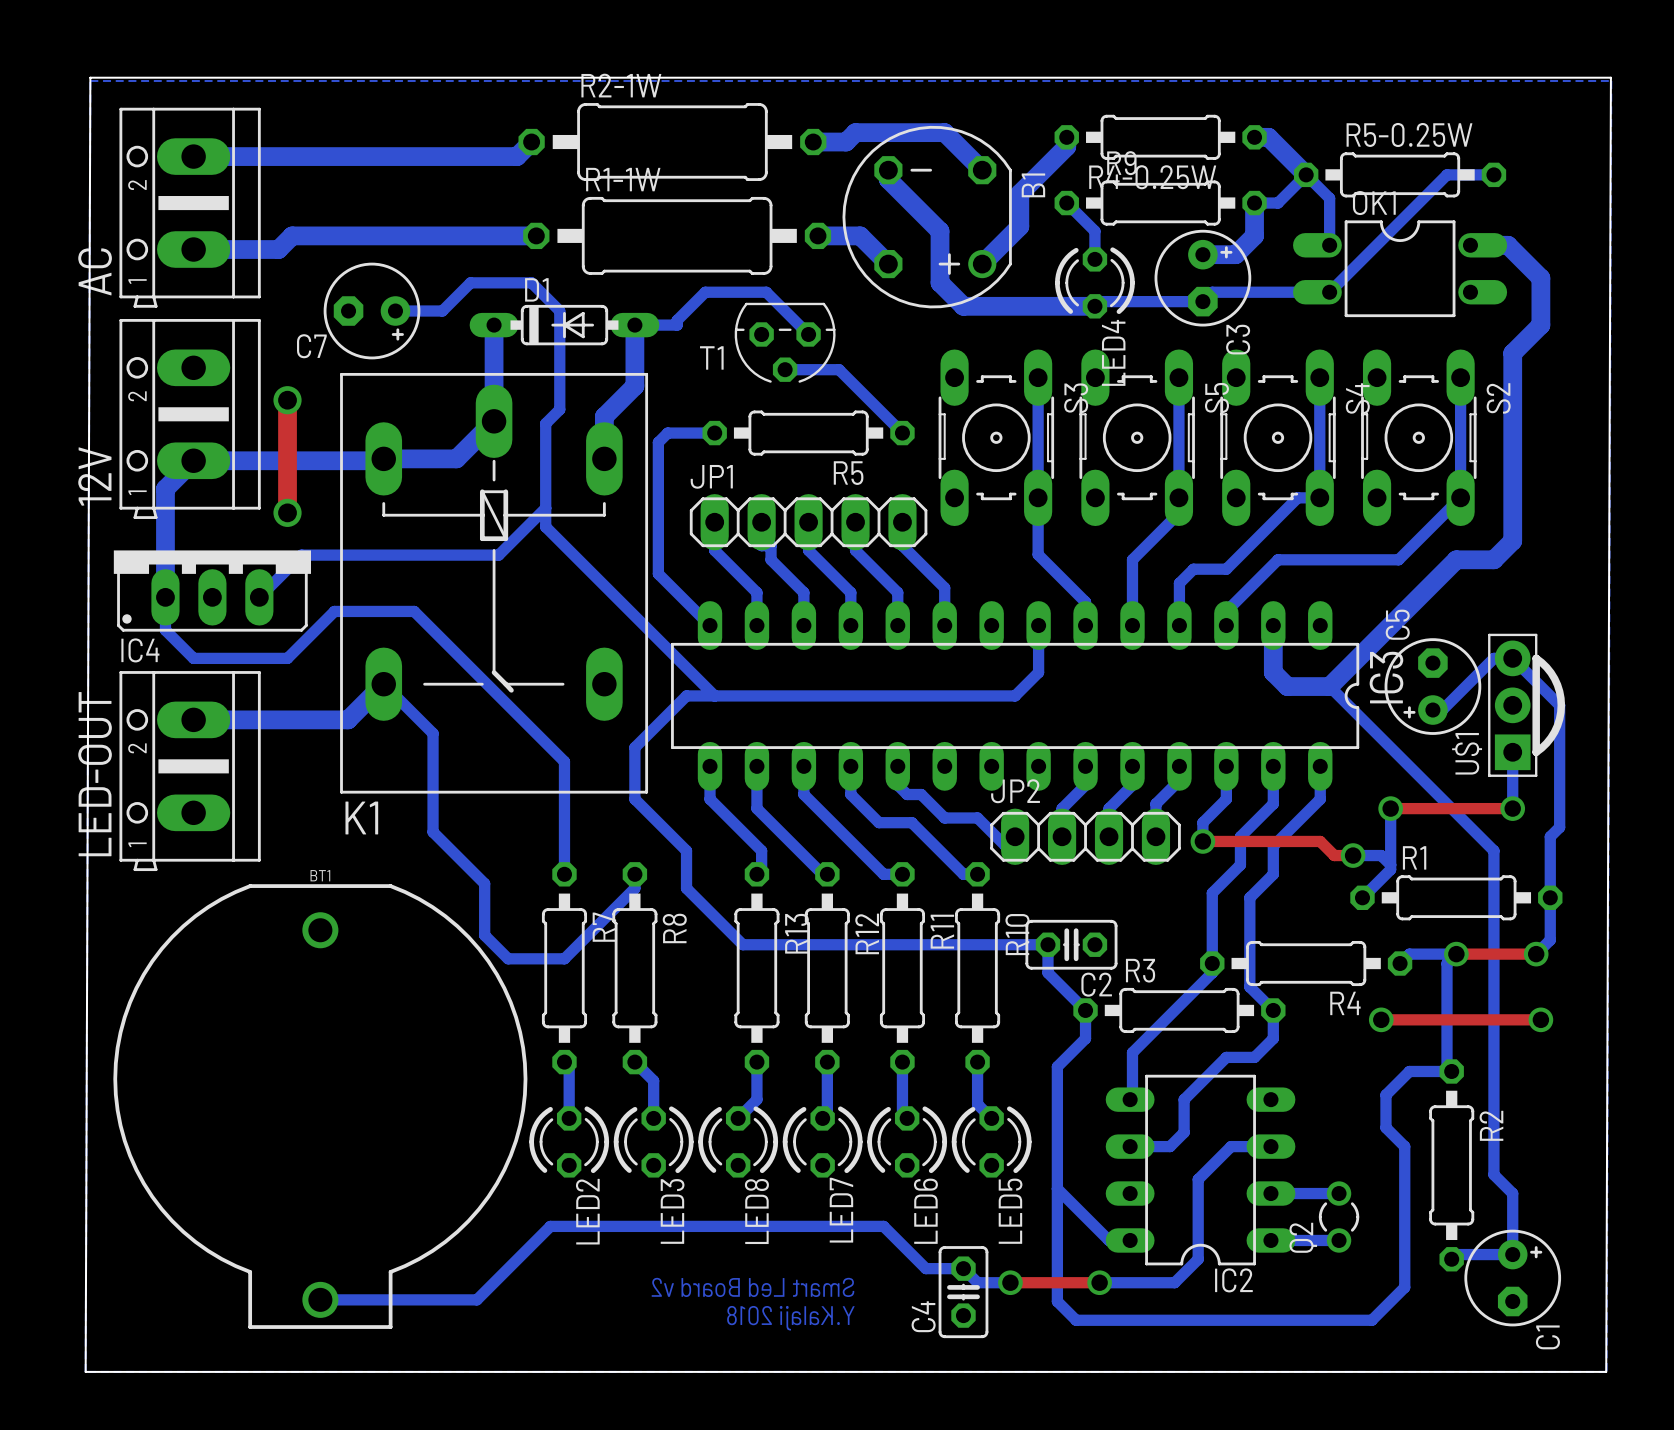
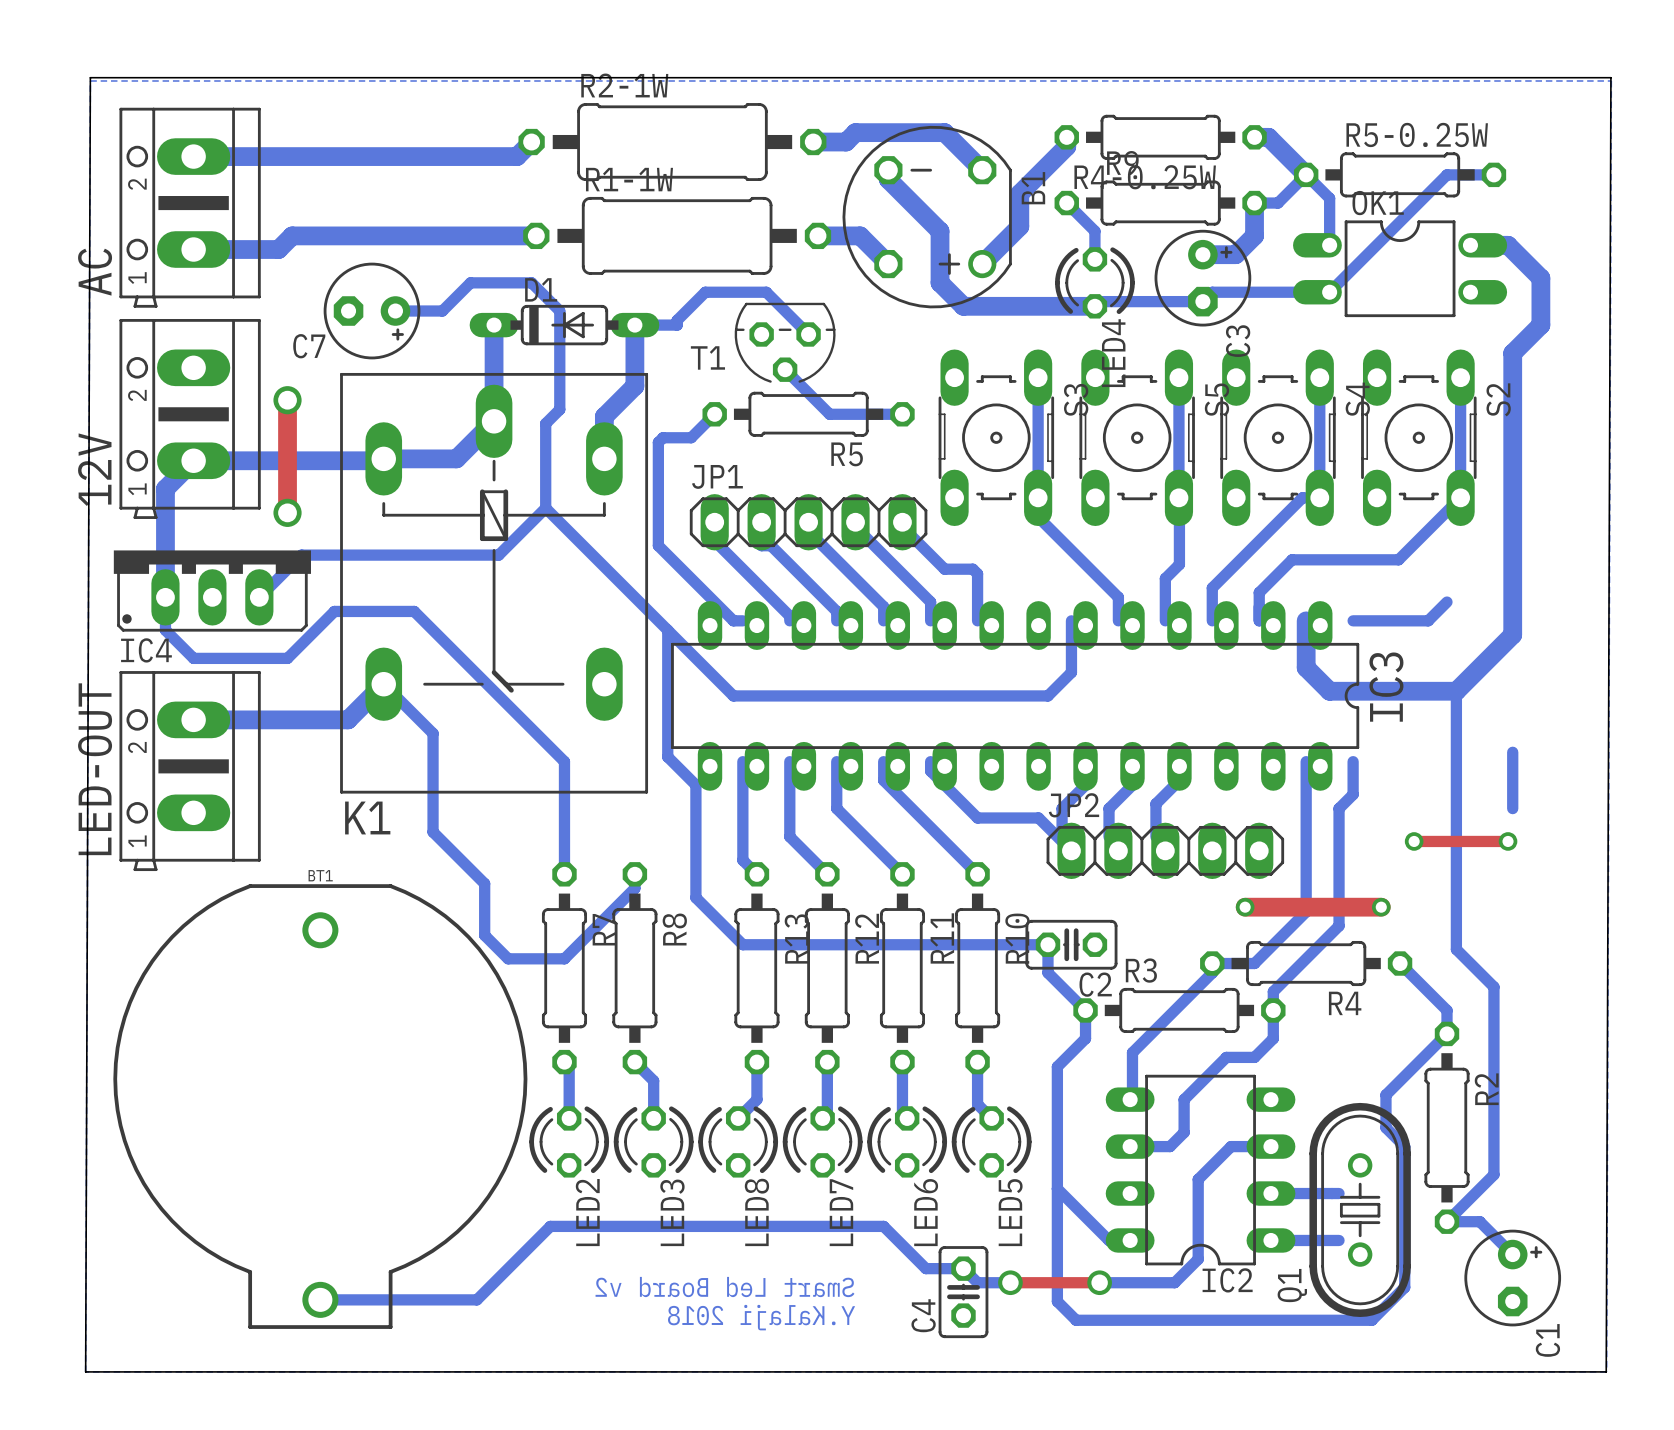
bottom track: (785, 369) (839, 369) (902, 433) -> (785, 369) (829, 414) (902, 414)
bottom track: (714, 433) (667, 433) (663, 437) -> (714, 414) (691, 437) (663, 437)
R5 position: (808, 433) -> (808, 414)
bottom track: (1038, 497) (1038, 554) (1085, 602) (1085, 625) -> (1038, 497) (1038, 517) (1118, 597) (1118, 620)
bottom track: (1178, 497) (1178, 513) (1132, 559) (1132, 625) -> (1178, 497) (1179, 564) (1165, 578) (1165, 620)
bottom track: (1302, 497) (1297, 497) (1226, 569) (1193, 569) (1179, 583) (1179, 625) -> (1302, 497) (1212, 587) (1212, 620)
bottom track: (545, 508) (545, 526) (714, 695) -> (545, 508) (733, 695)
bottom track: (855, 526) (855, 550) (897, 592) (897, 625) -> (855, 526) (930, 602) (930, 620)
bottom track: (902, 526) (902, 545) (944, 587) (944, 625) -> (902, 526) (944, 569) (972, 569) (977, 573) (977, 620)
bottom track: (808, 531) (808, 550) (850, 592) (850, 625) -> (808, 531) (883, 606) (883, 620)
bottom track: (714, 541) (714, 550) (756, 592) (756, 625) -> (714, 541) (789, 616) (789, 620)
bottom track: (1512, 541) (1493, 559) (1456, 559) (1329, 686) -> (1512, 541) (1512, 634) (1456, 691)
bottom track: (658, 545) (658, 573) (710, 625) -> (658, 545) (733, 620) (742, 620)
bottom track: (771, 545) (771, 559) (803, 592) (803, 625) -> (771, 545) (836, 611) (836, 620)
bottom track: (1292, 559) (1278, 559) (1231, 606) (1231, 620) (1226, 625) -> (1292, 559) (1259, 592) (1259, 620)
bottom track: none -> (1447, 602) (1428, 620) (1353, 620)
bottom track: none -> (1306, 620) (1306, 667) (1329, 691) (1456, 691)
bottom track: (1038, 625) (1038, 672) (1015, 695) -> (1071, 620) (1071, 672) (1047, 695) (1015, 695)
bottom track: (1273, 625) (1273, 672) (1287, 686) (1329, 686) -> none
bottom track: (1329, 686) (1493, 850) (1493, 986) -> (1456, 691) (1456, 949) (1493, 986)
C5: (1432, 686) -> none
bottom track: (733, 695) (686, 695) (634, 747) (634, 799) (686, 850) (686, 888) (695, 897) -> (667, 630) (667, 756) (695, 785) (695, 897)
U$1: (1526, 705) -> none
bottom track: (1432, 710) (1442, 710) (1493, 658) (1512, 658) (1559, 705) (1559, 827) (1550, 836) (1550, 940) (1536, 954) -> none
bottom track: none -> (930, 761) (930, 771) (977, 817) (1038, 817) (1071, 850)
bottom track: (710, 766) (710, 799) (761, 850) (761, 869) (756, 874) -> (742, 761) (742, 860) (756, 874)
bottom track: (756, 766) (756, 808) (822, 874) (827, 874) -> (789, 761) (789, 836) (827, 874)
bottom track: (803, 766) (803, 794) (883, 874) (902, 874) -> (836, 761) (836, 808) (902, 874)
bottom track: (850, 766) (850, 794) (878, 822) (911, 822) (963, 874) (977, 874) -> (883, 761) (883, 780) (977, 874)
bottom track: (897, 766) (897, 785) (907, 794) (921, 794) (944, 817) (977, 817) (1005, 846) (1015, 836) -> none
bottom track: (1226, 766) (1226, 799) (1202, 822) (1202, 841) -> none
bottom track: (1273, 766) (1273, 803) (1240, 836) (1240, 864) (1212, 893) (1212, 963) -> (1306, 761) (1306, 911) (1254, 963) (1212, 963)
bottom track: (1320, 766) (1320, 799) (1273, 846) (1273, 874) (1249, 897) (1249, 986) (1273, 1010) -> (1353, 761) (1353, 794) (1339, 808) (1339, 925) (1273, 991) (1273, 1010)
JP2 footprint: [990, 808, 1181, 865] -> [1046, 822, 1285, 880]
top track: (1390, 808) (1512, 808) -> none
bottom track: (1390, 808) (1390, 869) (1362, 897) -> none
via: (1390, 808) -> none
via: (1512, 808) -> none
top track: (1202, 841) (1320, 841) (1334, 855) (1353, 855) -> none
via: (1202, 841) -> none
top track: none -> (1414, 841) (1508, 841)
via: none -> (1414, 841)
via: none -> (1508, 841)
bottom track: (1353, 855) (1381, 855) (1390, 864) -> none
via: (1353, 855) -> none
R1: (1456, 897) -> none
top track: none -> (1245, 907) (1381, 907)
via: none -> (1245, 907)
via: none -> (1381, 907)
top track: (1456, 954) (1536, 954) -> none
via: (1456, 954) -> none
via: (1536, 954) -> none
bottom track: (1400, 963) (1409, 954) (1456, 954) (1447, 963) (1447, 1010) -> (1400, 963) (1447, 1010)
top track: (1381, 1019) (1540, 1019) -> none
via: (1381, 1019) -> none
via: (1540, 1019) -> none
bottom track: (1447, 1033) (1447, 1066) (1451, 1071) (1409, 1071) -> (1447, 1033) (1409, 1071)
R2 position: (1451, 1165) -> (1447, 1127)
bottom track: (1493, 1174) (1512, 1193) (1512, 1254) (1456, 1254) (1451, 1259) -> (1493, 1174) (1447, 1221) (1479, 1221) (1512, 1254)
Q1: none -> (1360, 1209)
Q2: (1339, 1217) -> none

